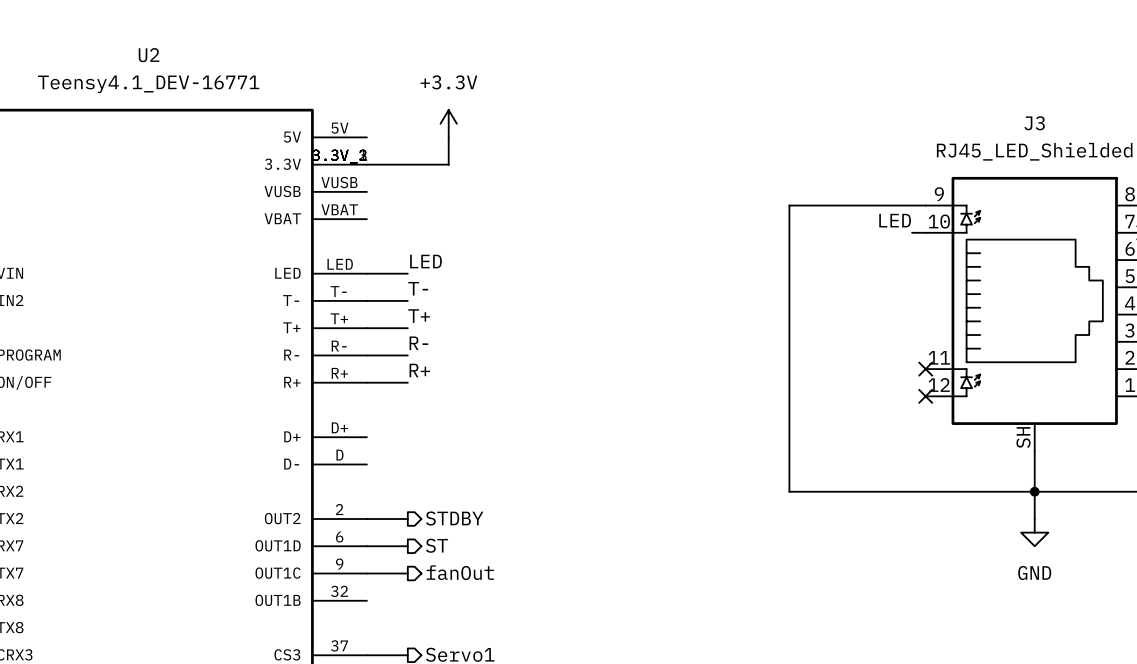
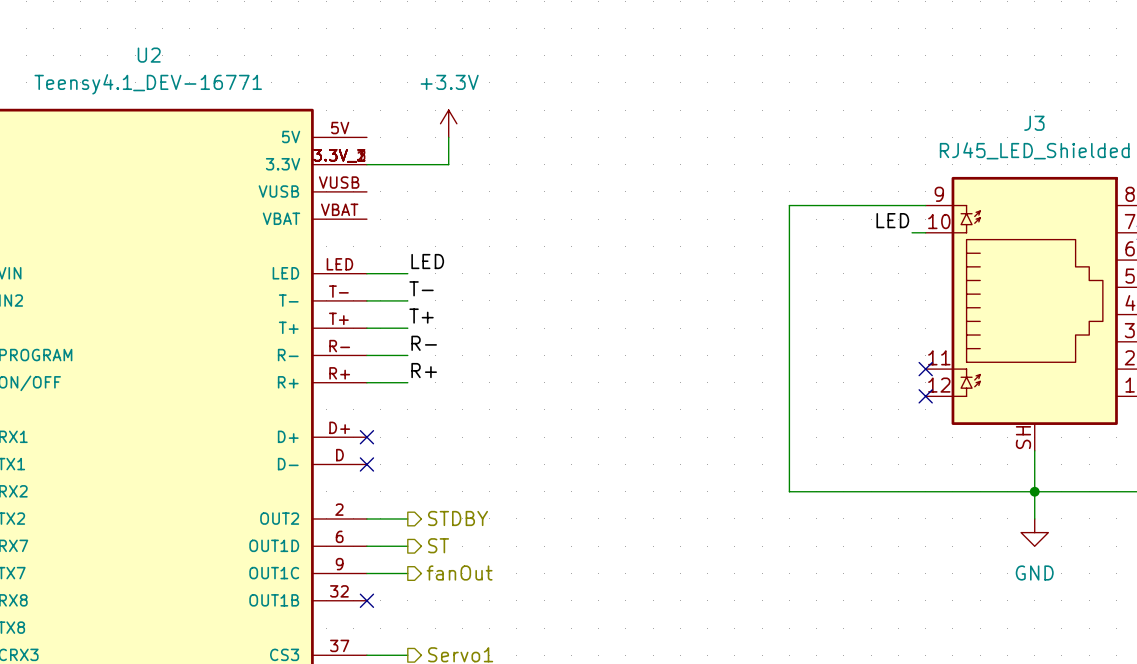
no-connect mark: none -> (366, 437)
no-connect mark: none -> (366, 464)
no-connect mark: none -> (366, 600)

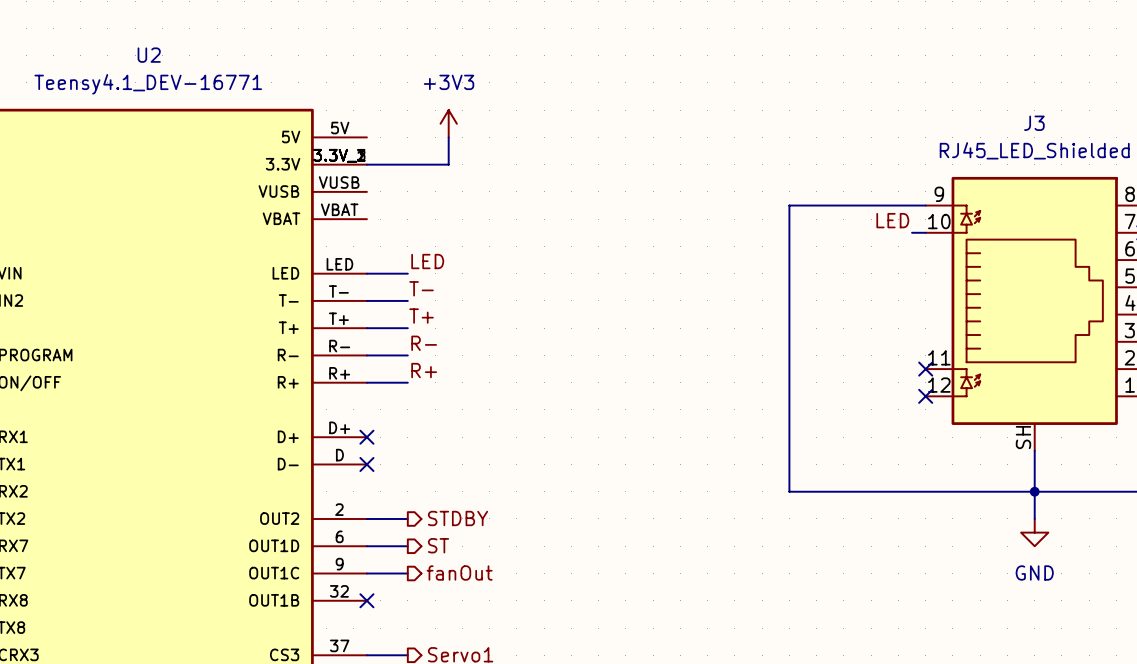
power symbol: +3.3V (448, 123) -> +3V3 (448, 123)

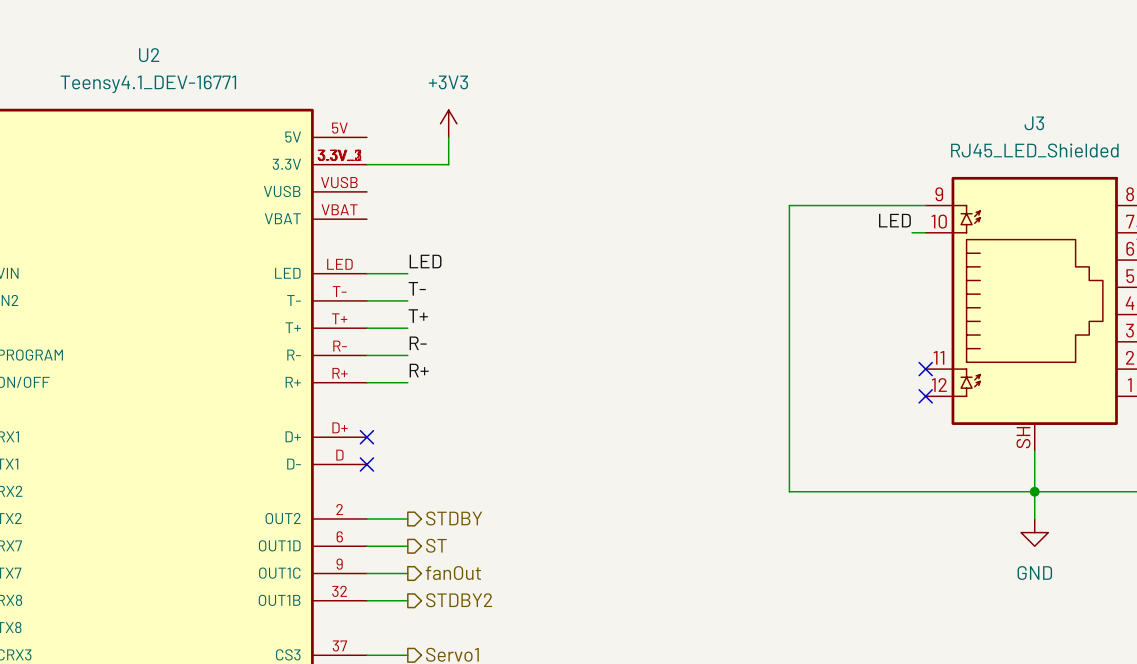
wire: none -> (366, 600) (407, 600)
no-connect mark: (366, 600) -> none
hierarchical label: none -> STDBY2 (459, 600)

